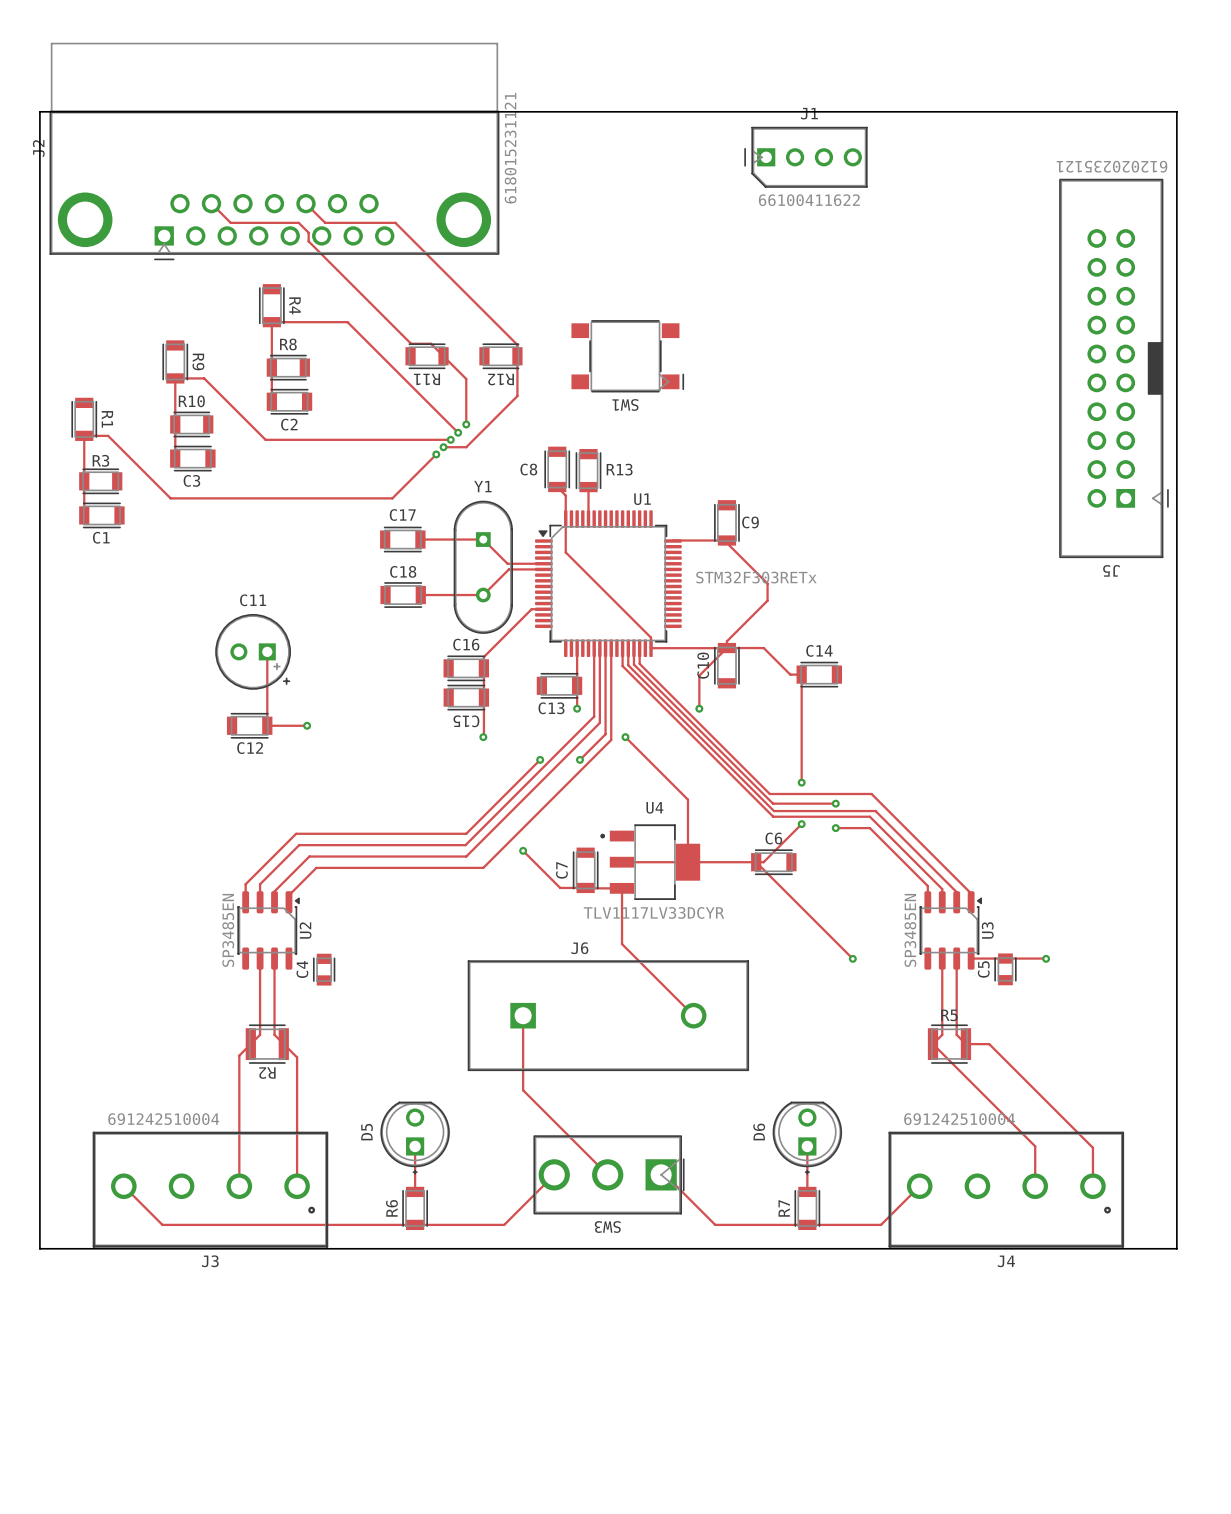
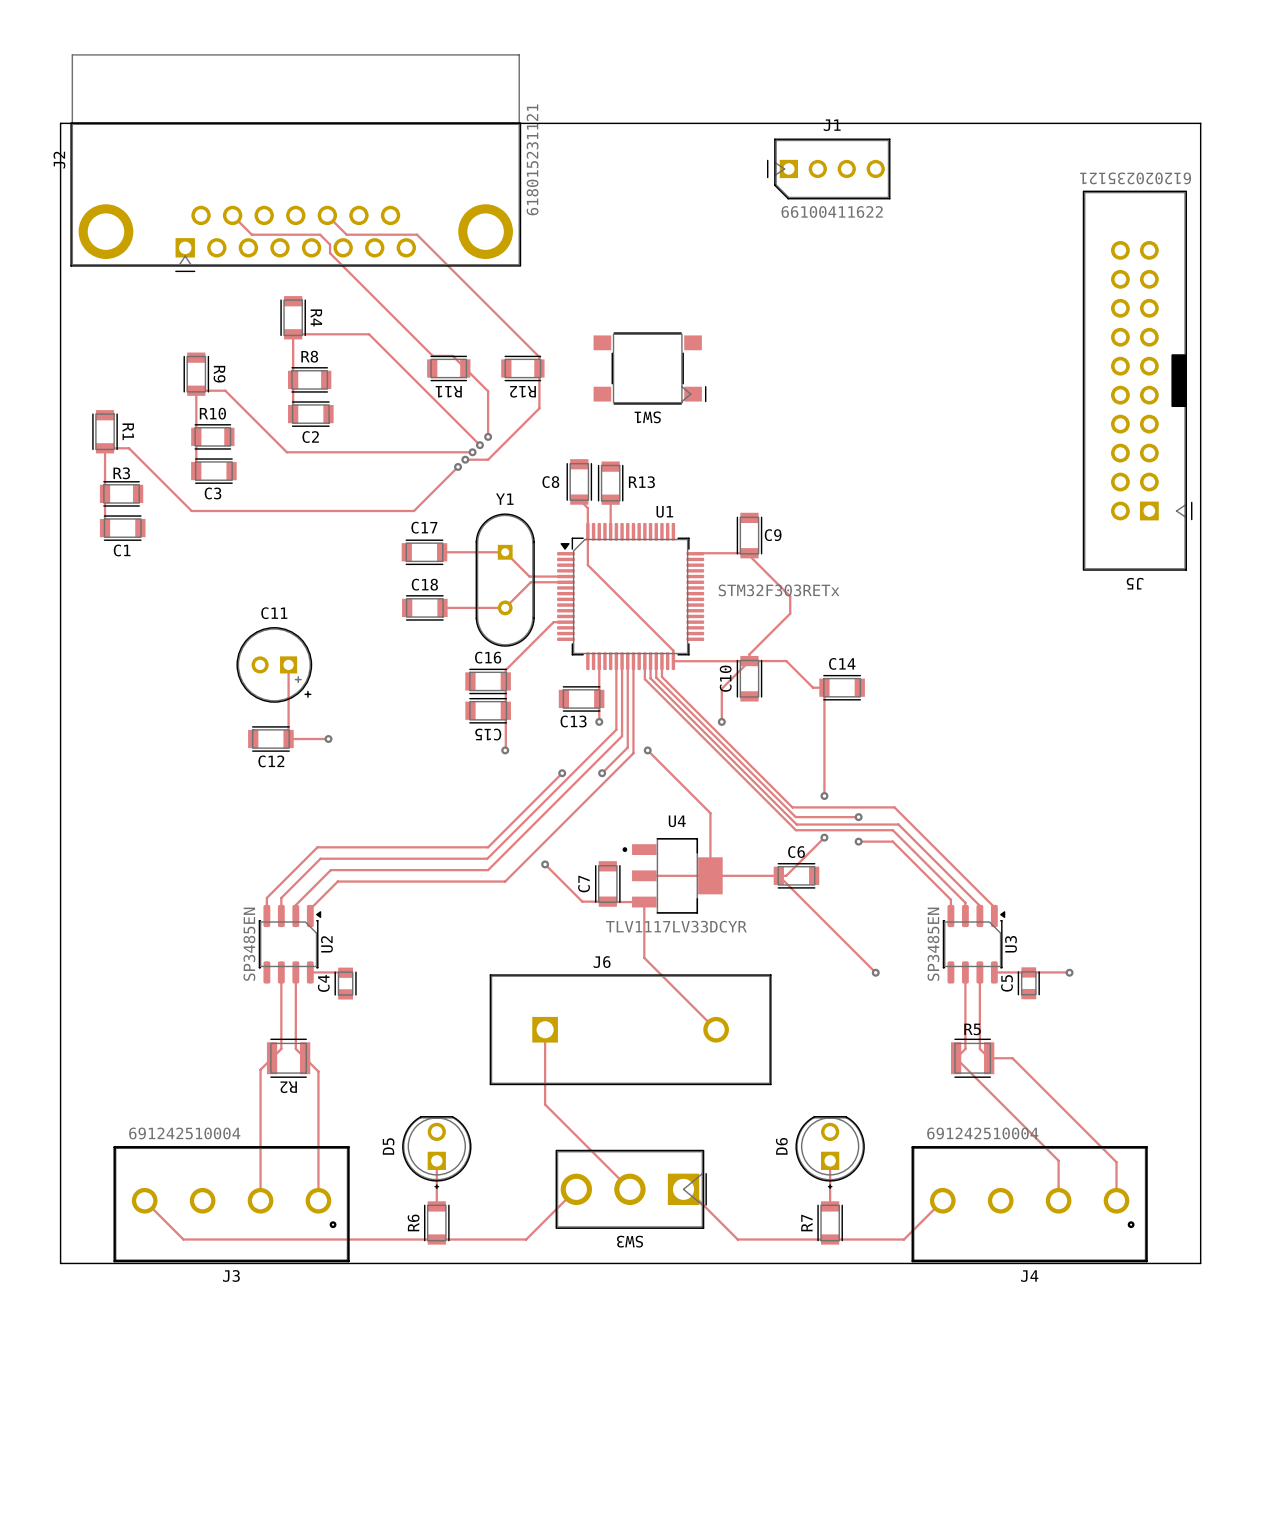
track: none -> (310, 972) (345, 972)

